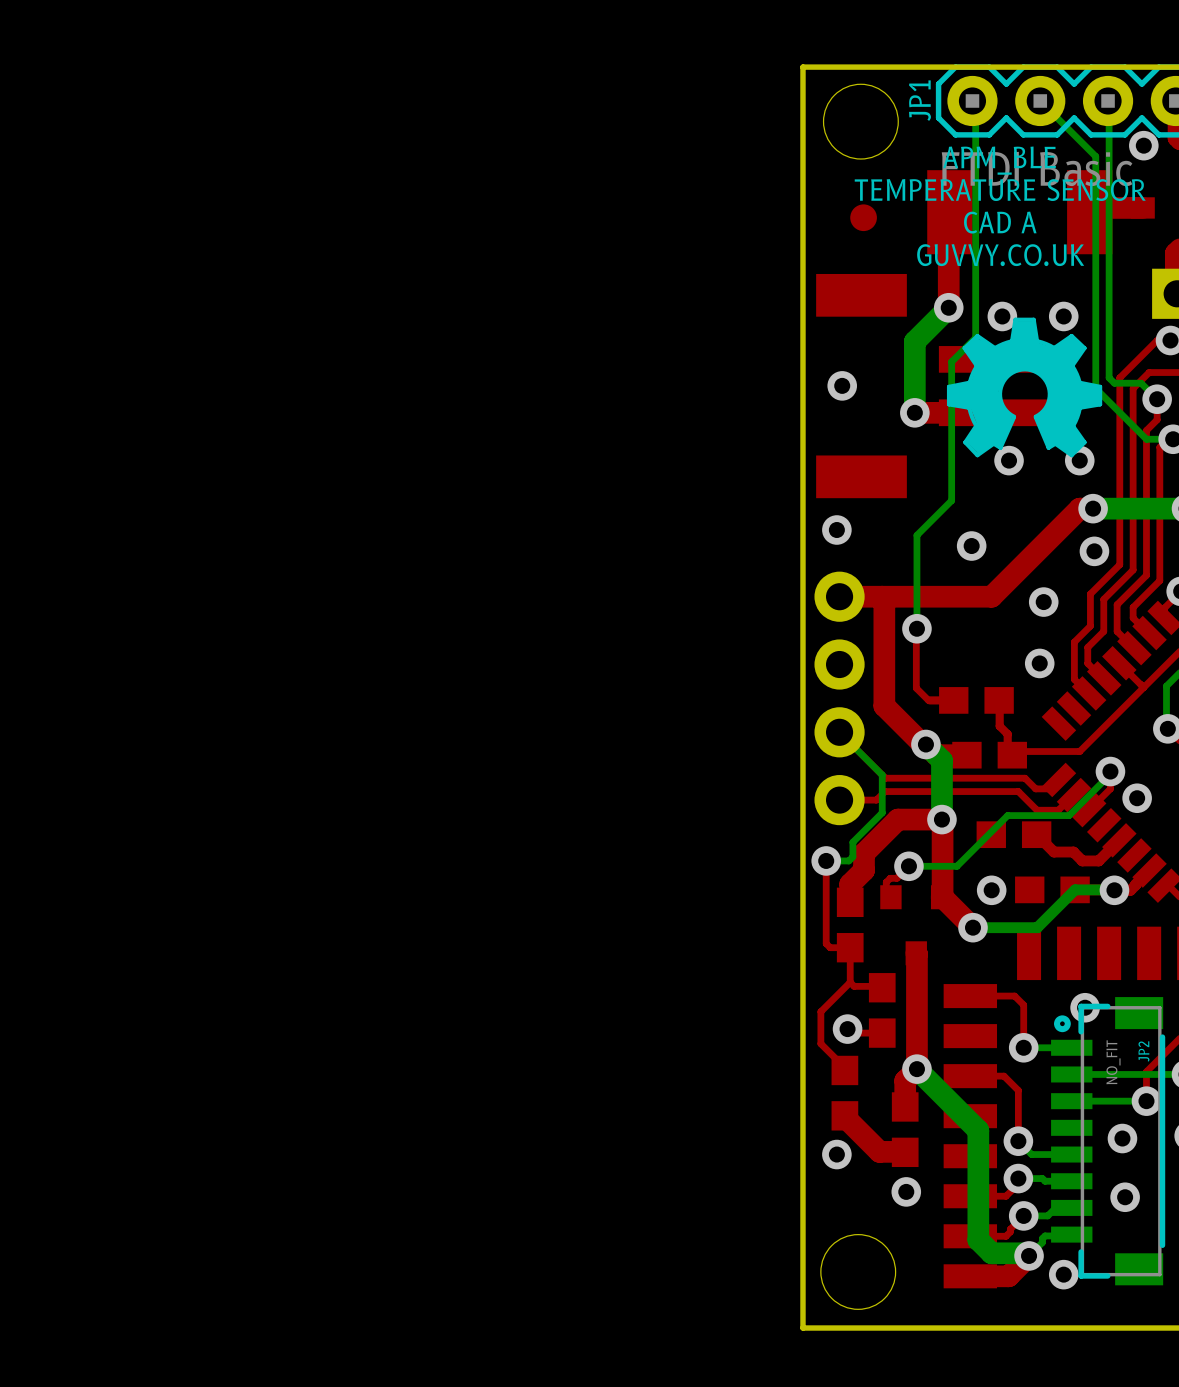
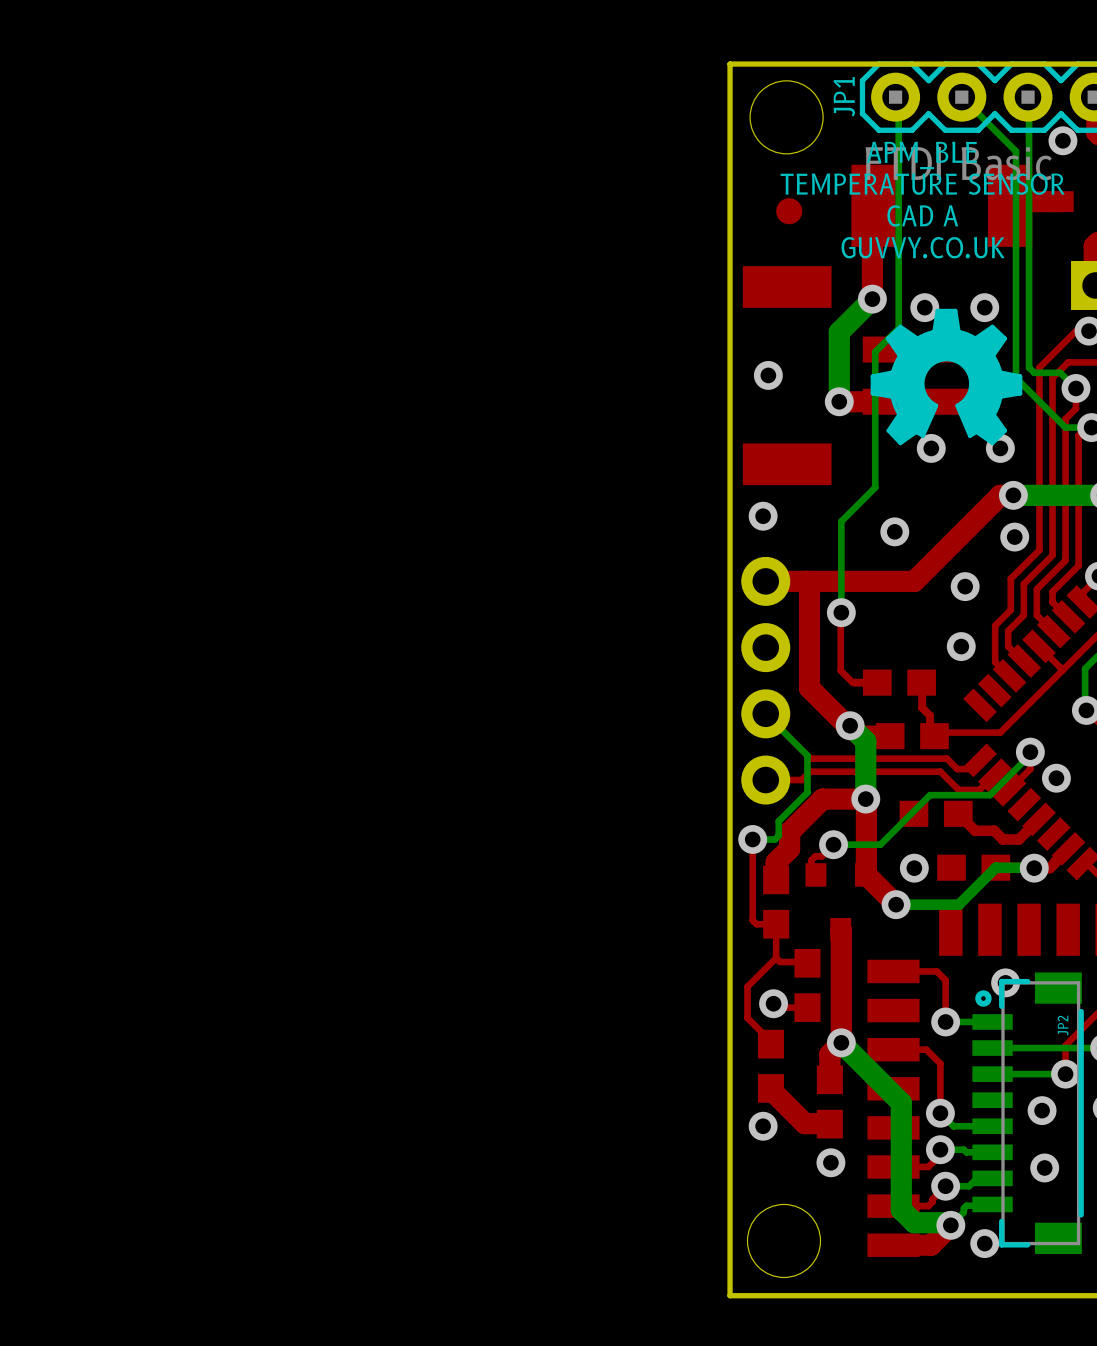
JP2 value: NO_FIT (1113, 1062) -> none

